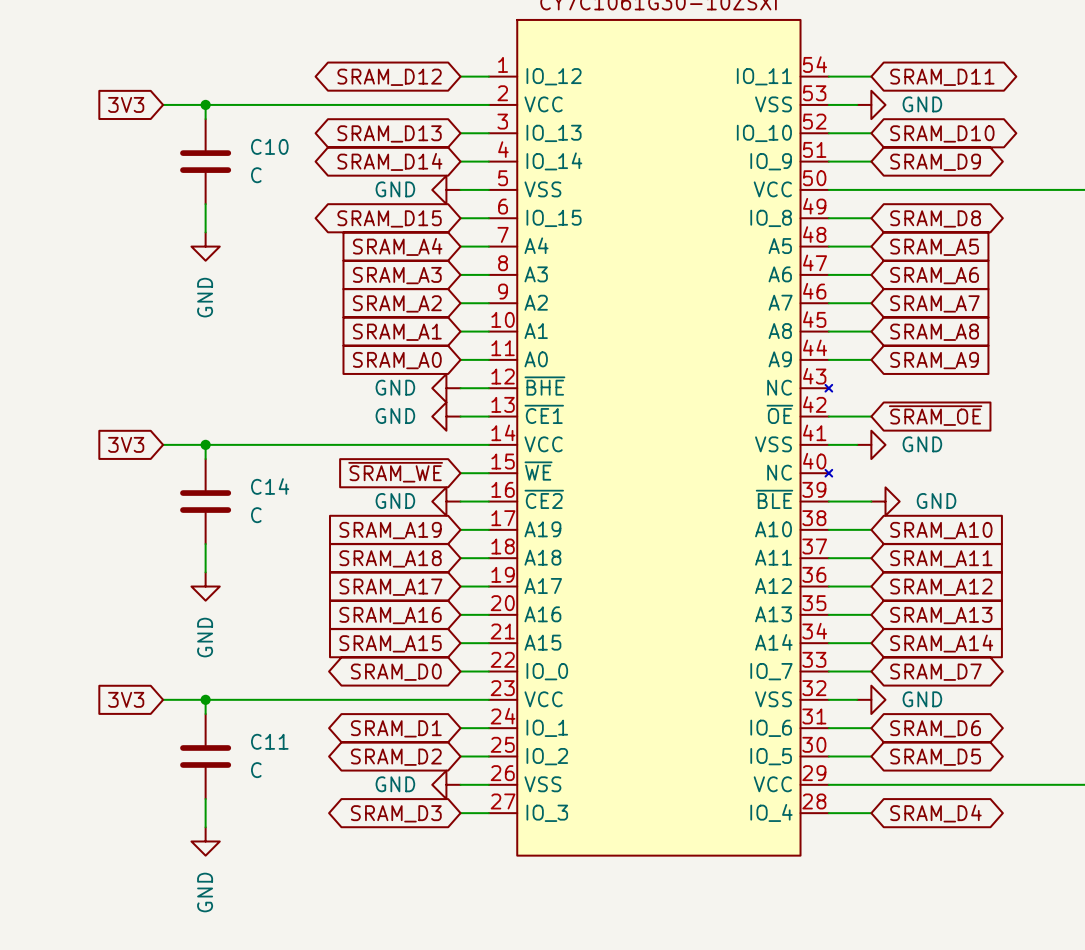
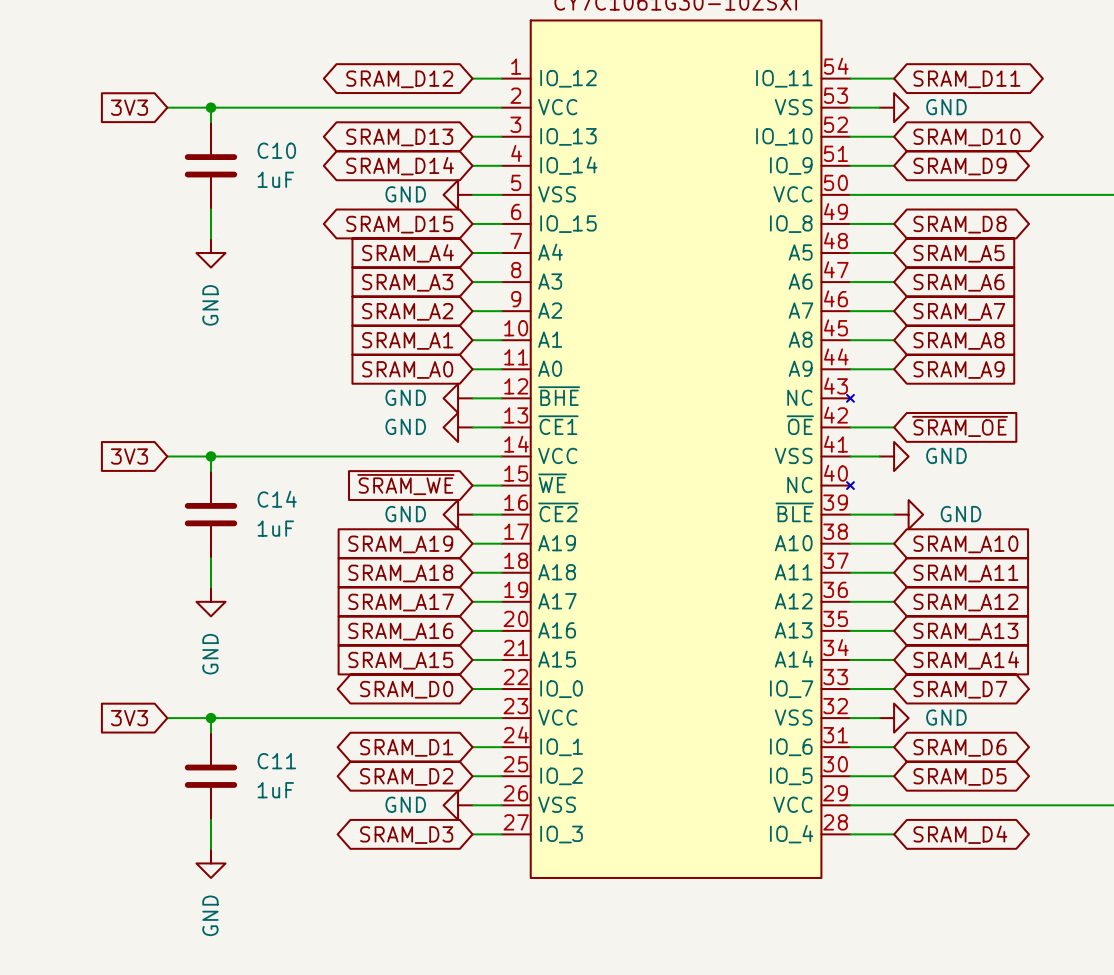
C10 value: C (256, 175) -> 1uF (275, 179)
C14 value: C (256, 515) -> 1uF (275, 528)
C11 value: C (256, 770) -> 1uF (275, 790)

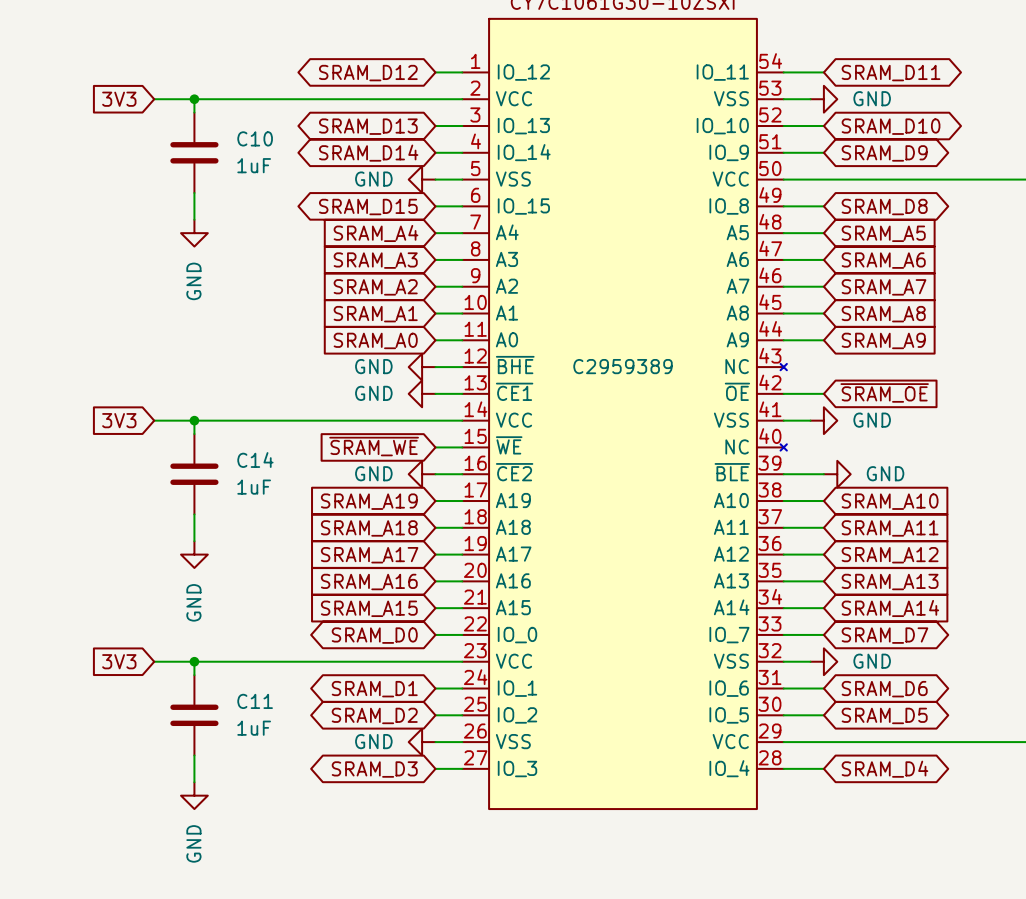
part text: none -> C2959389 (623, 366)

